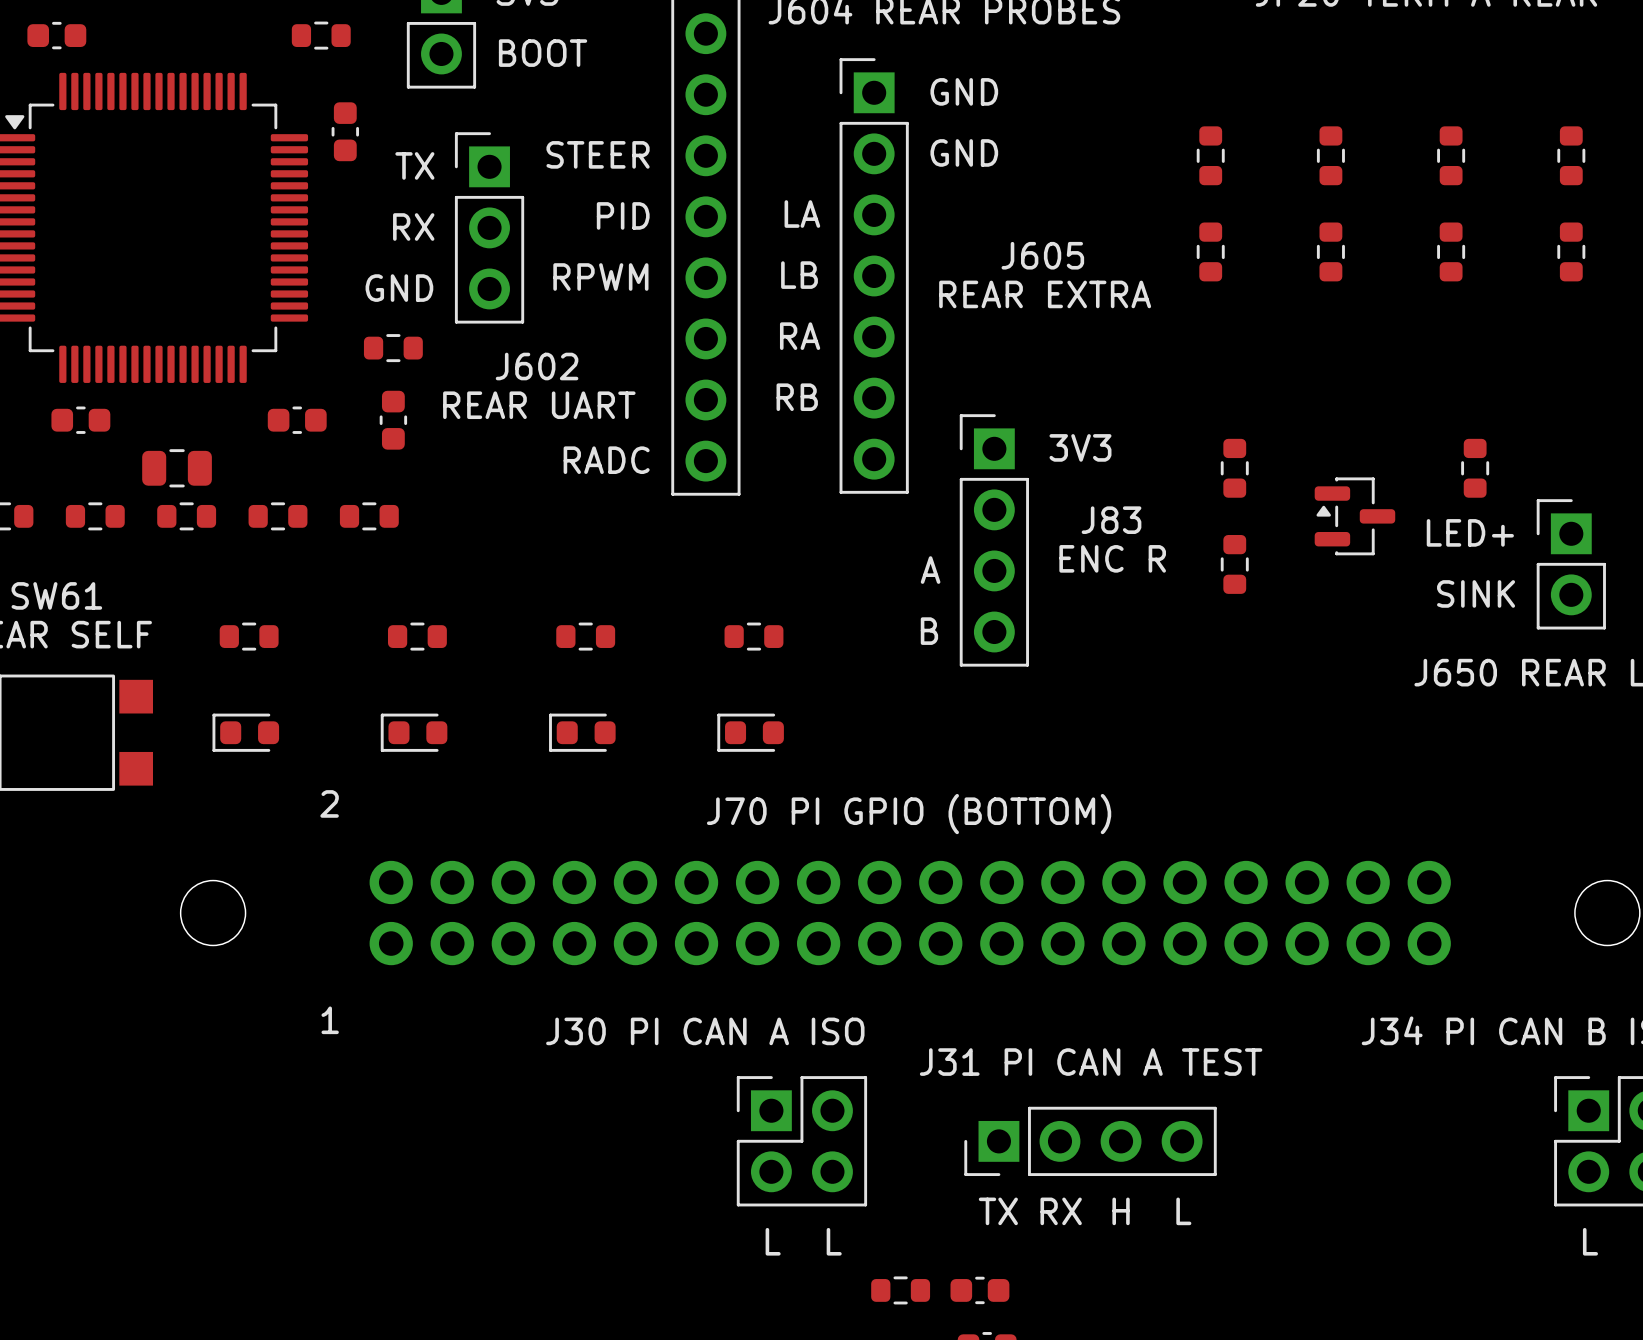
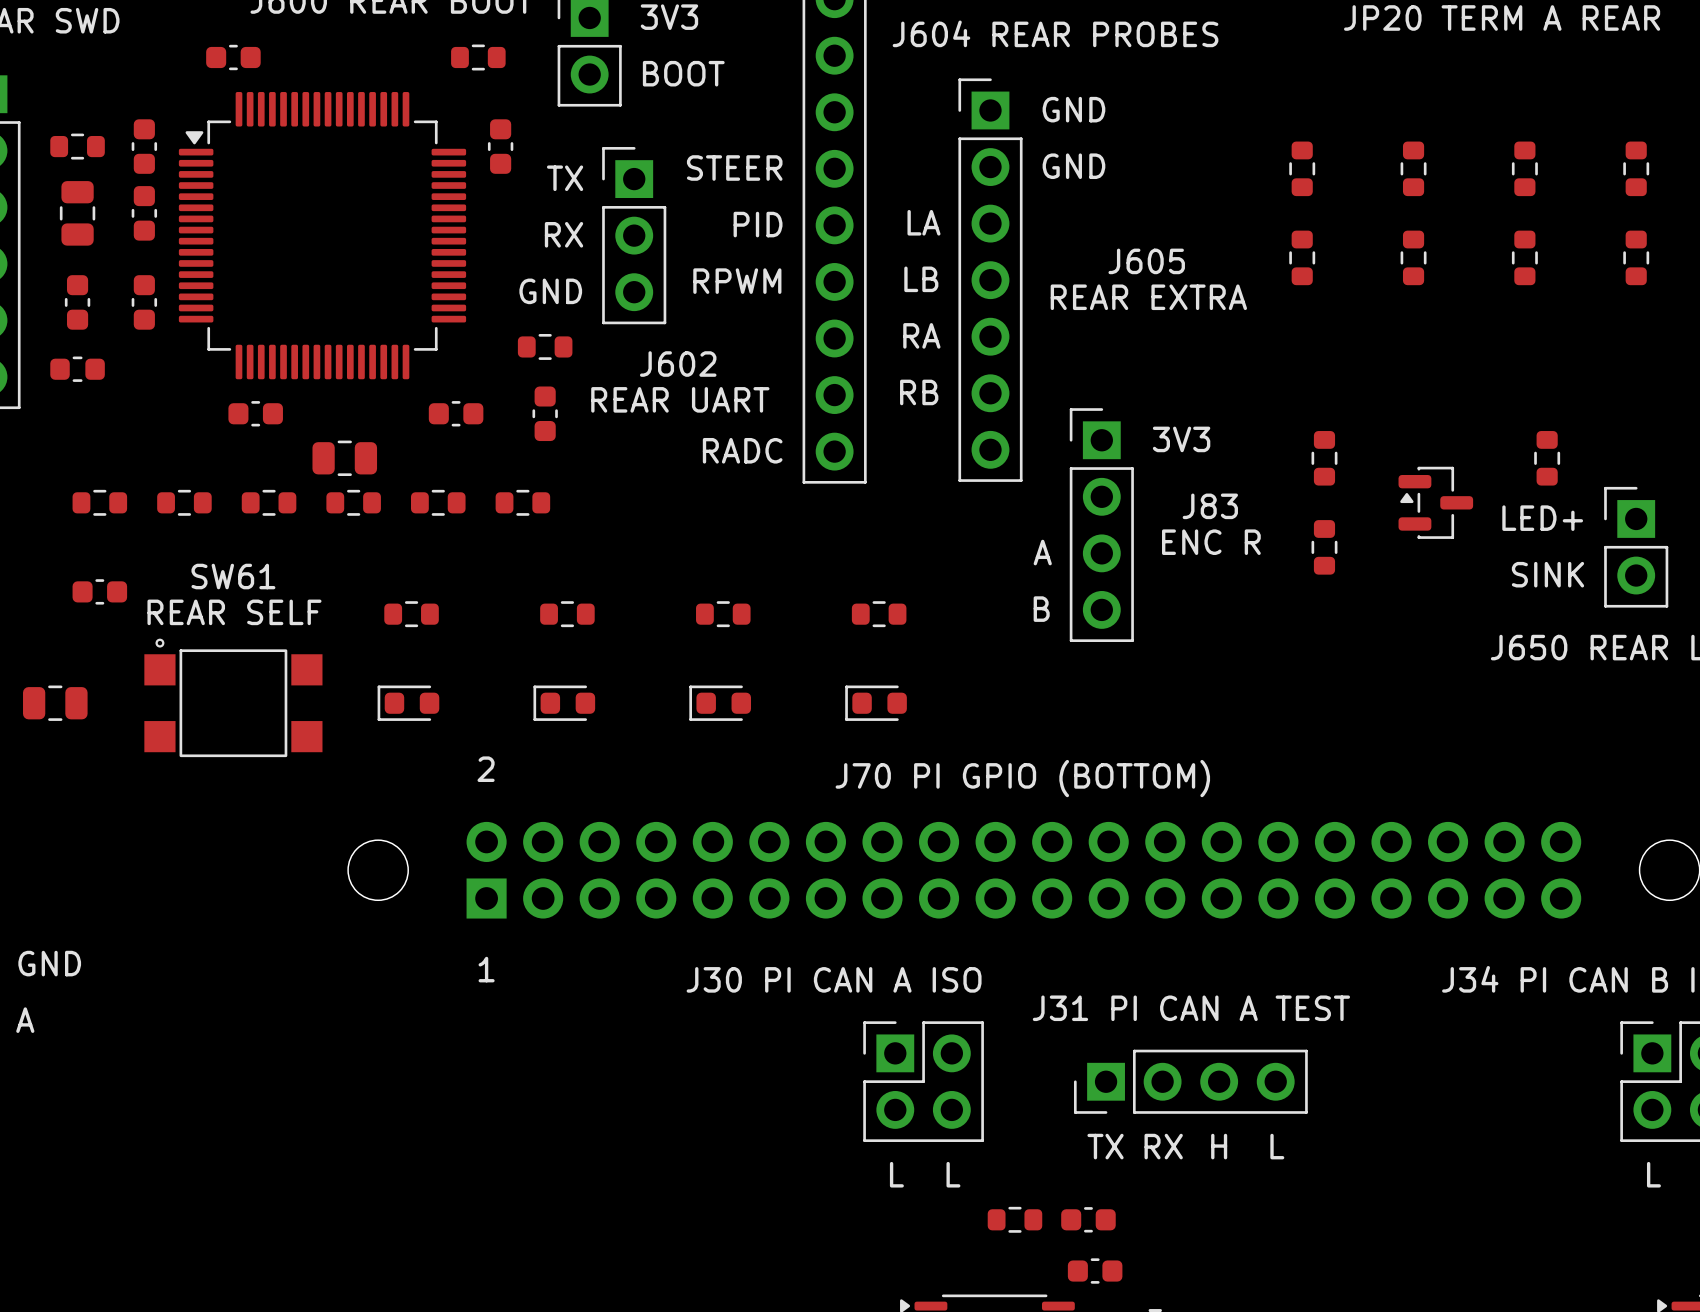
part footprint: [369, 860, 1451, 966] -> [466, 821, 1582, 919]

